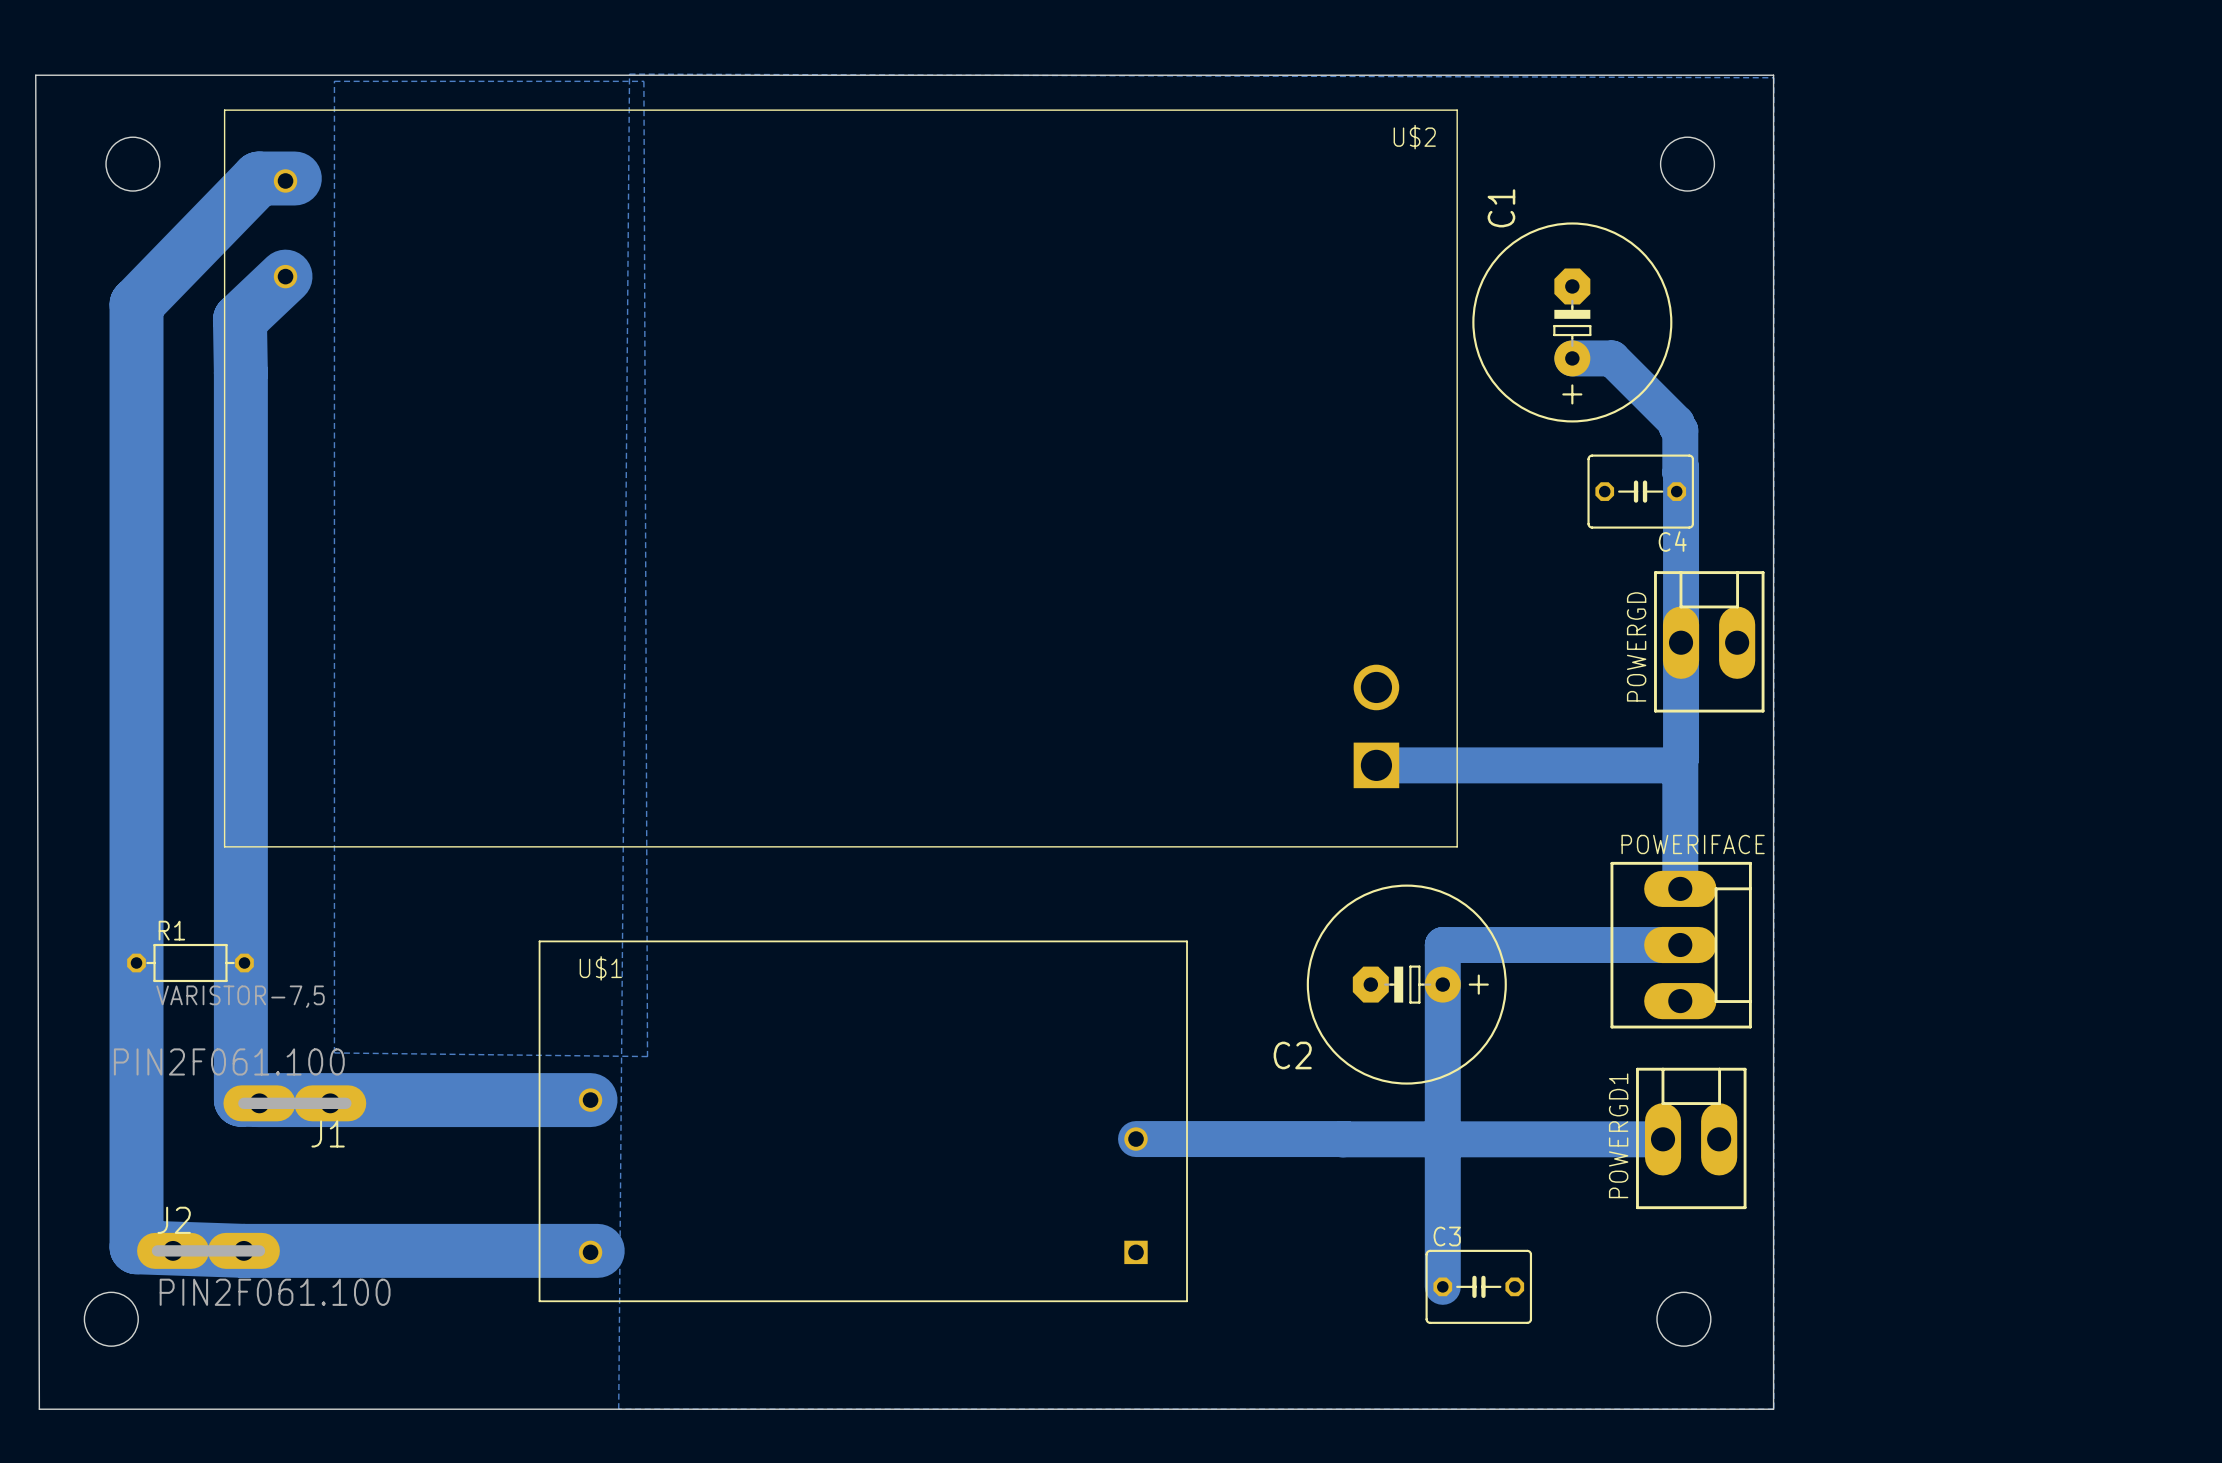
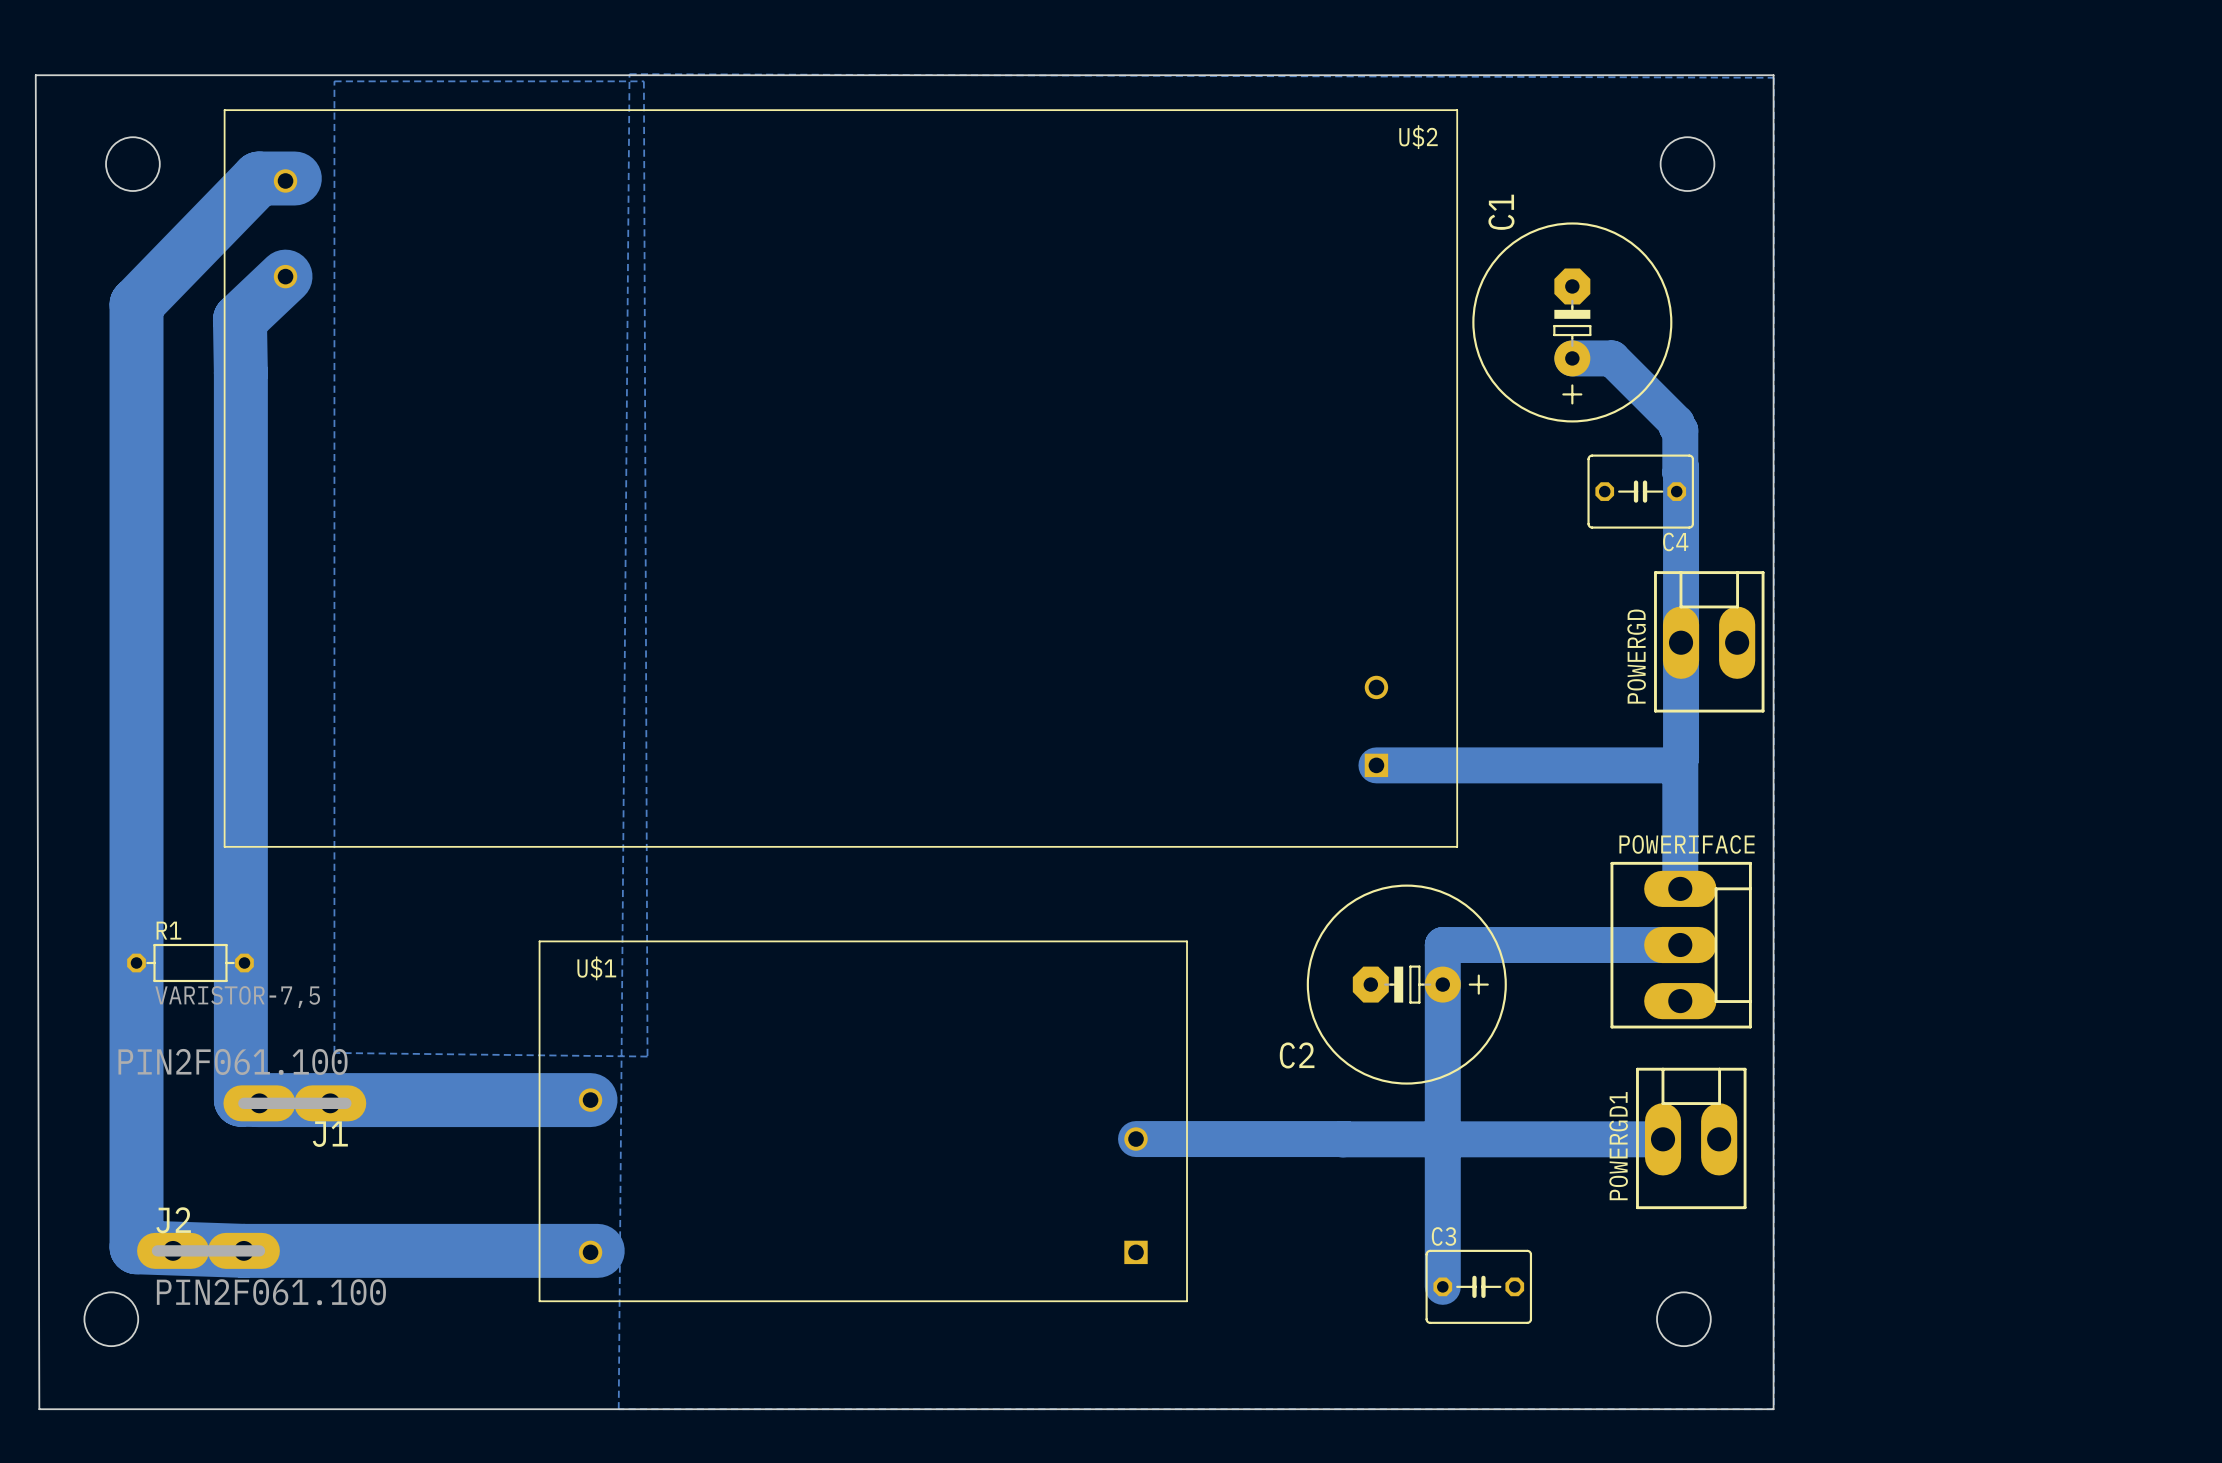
U$2 footprint: [224, 110, 1458, 847] -> [224, 110, 1458, 847]

